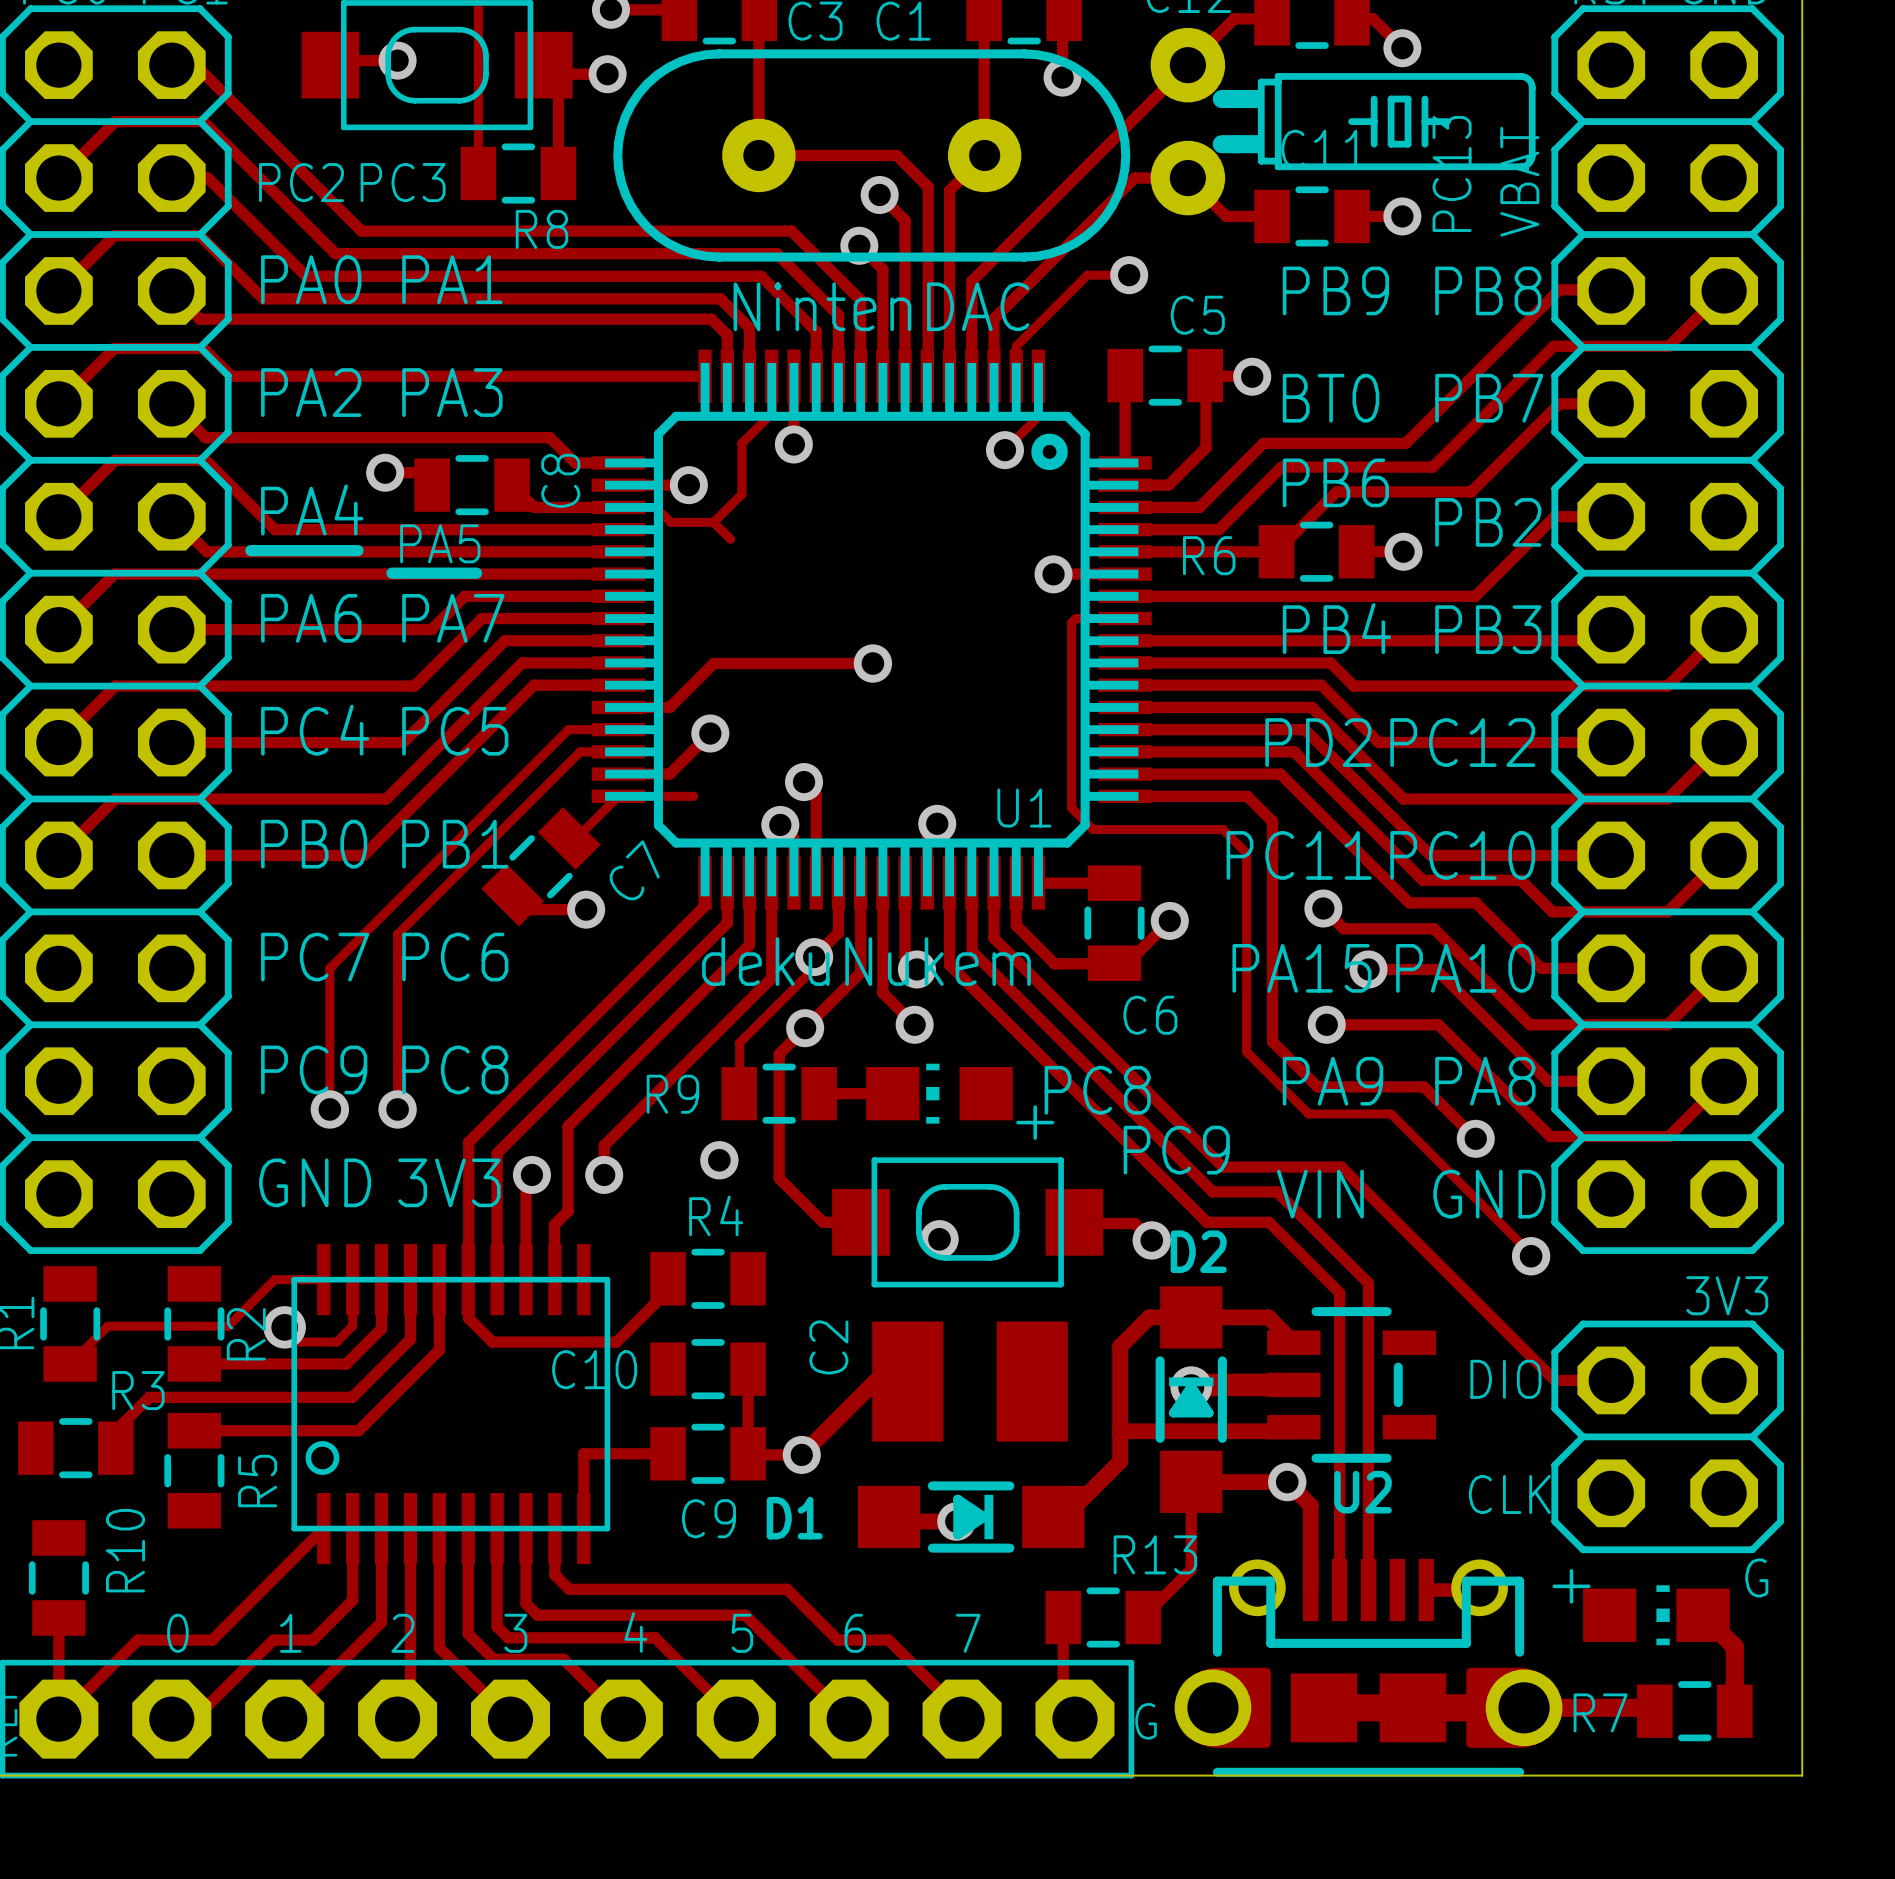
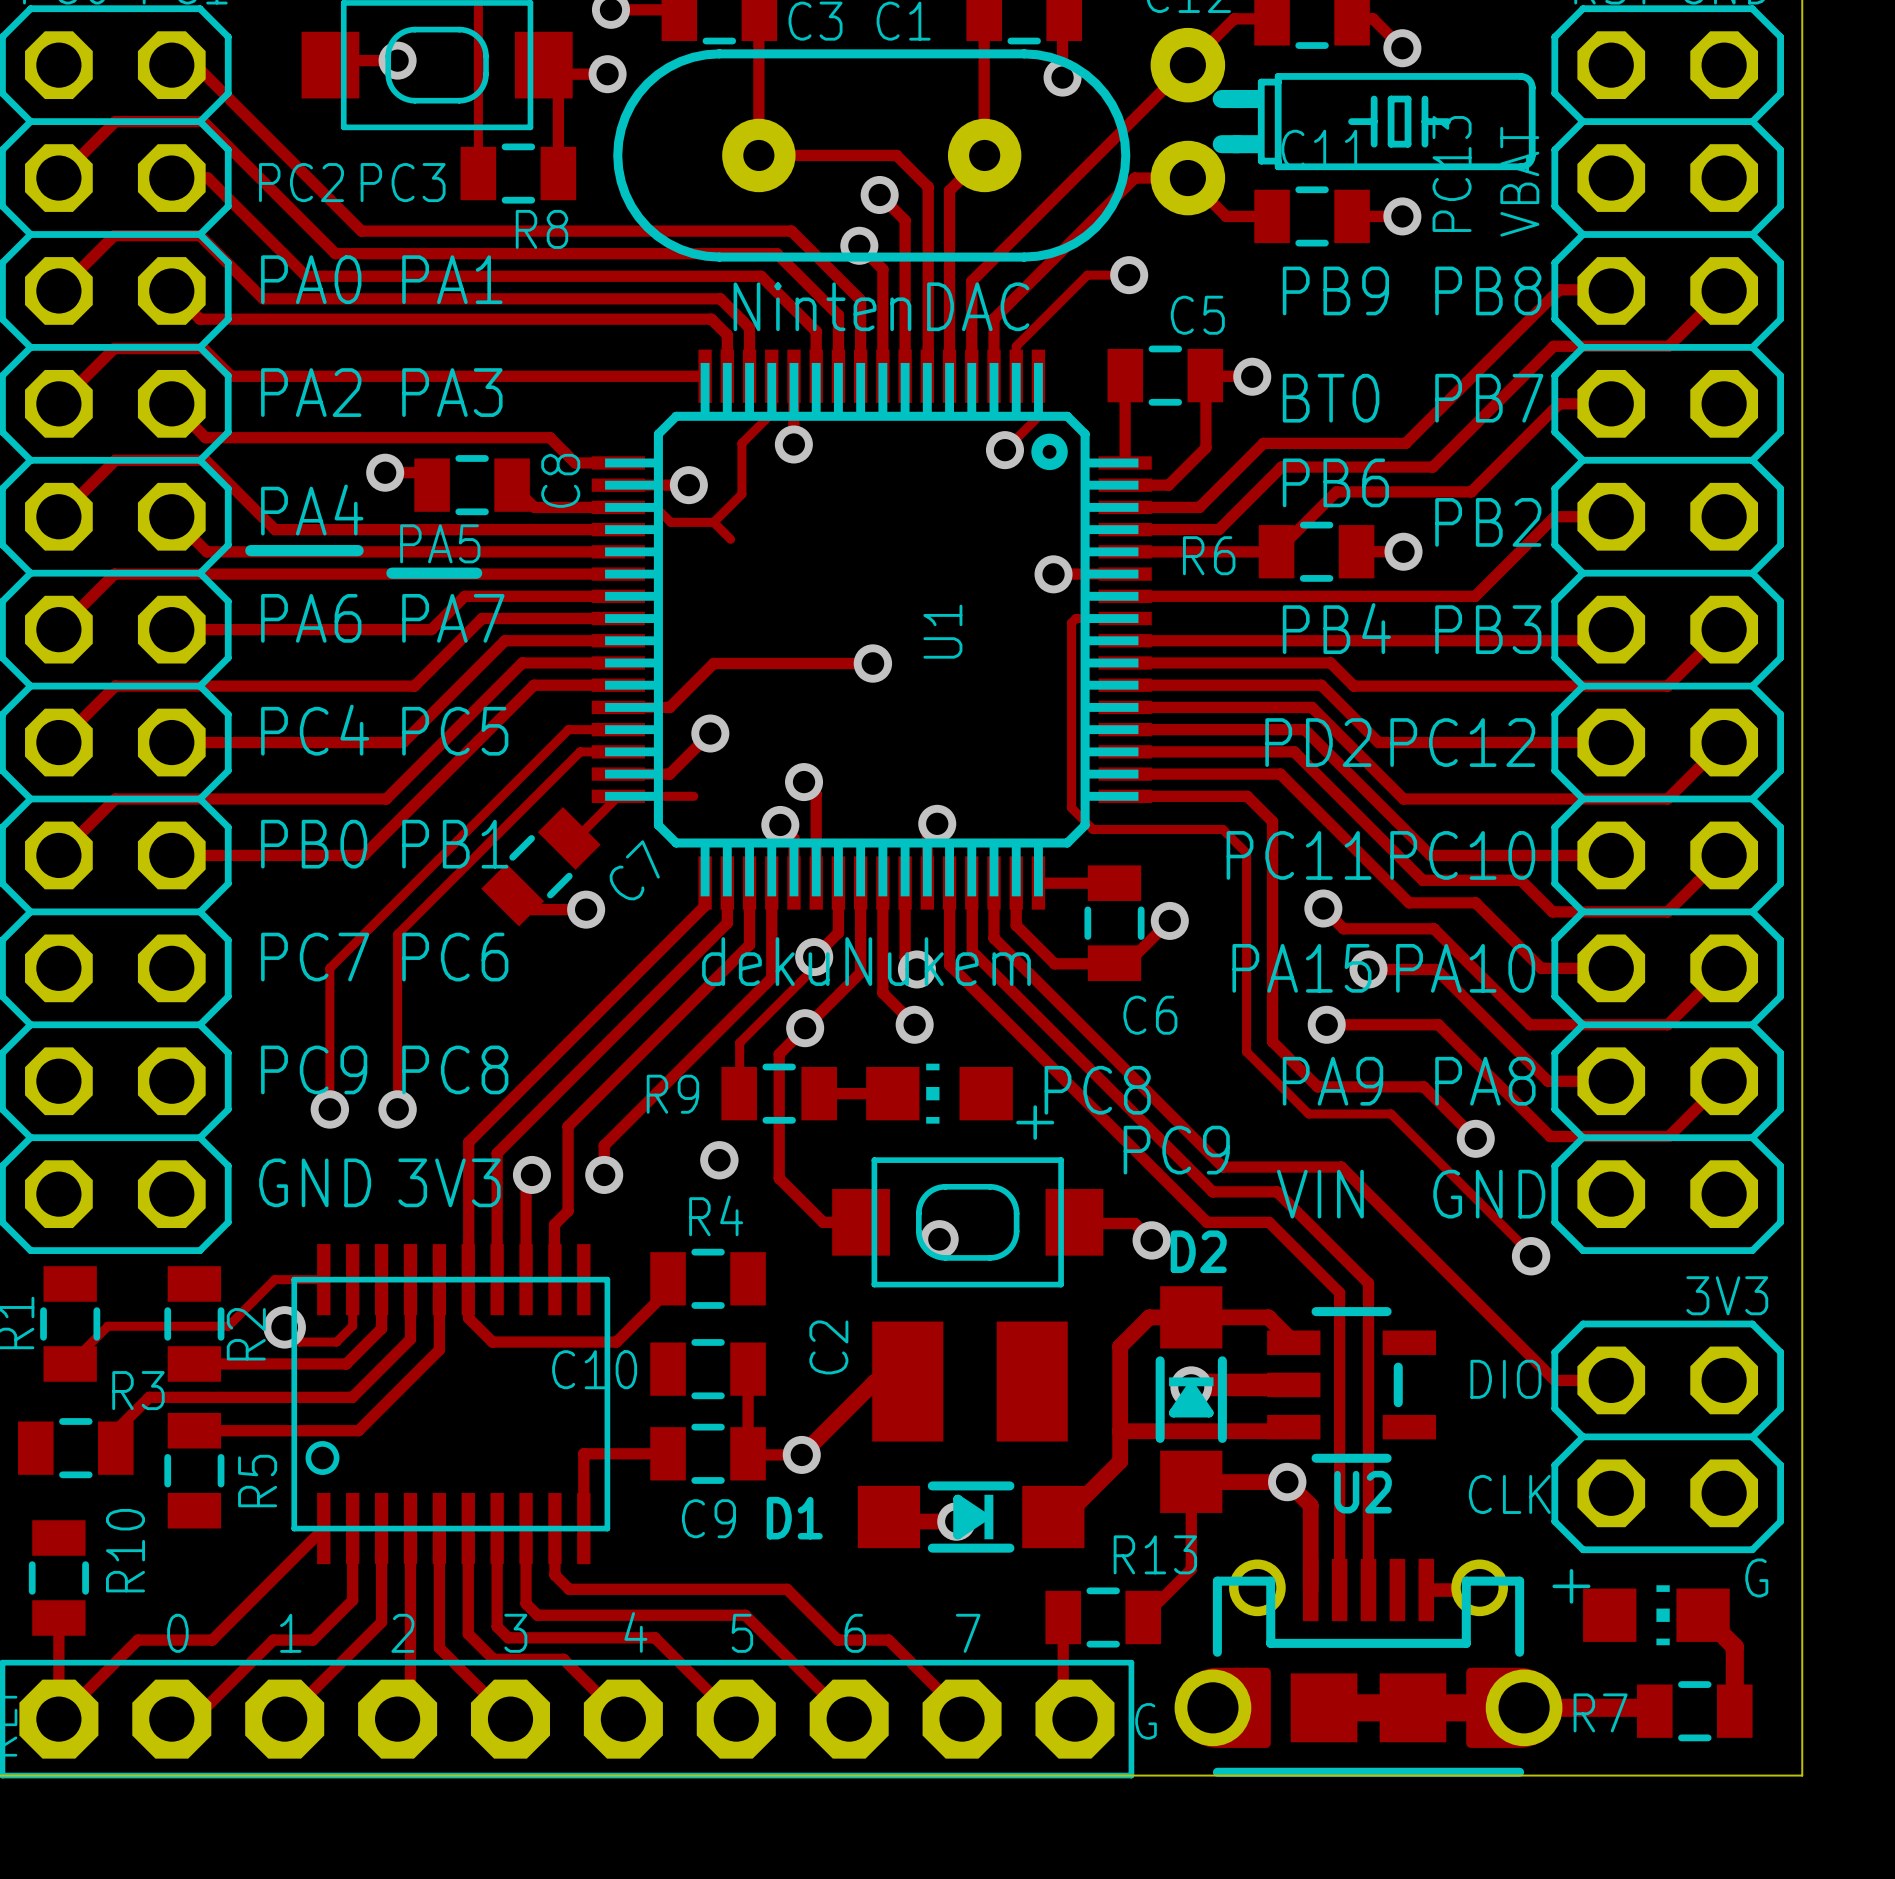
U1 name rotation: 0° (1024, 808) -> 90° counterclockwise (942, 631)
U1 name position: U1 (1024, 808) -> U1 (942, 631)

